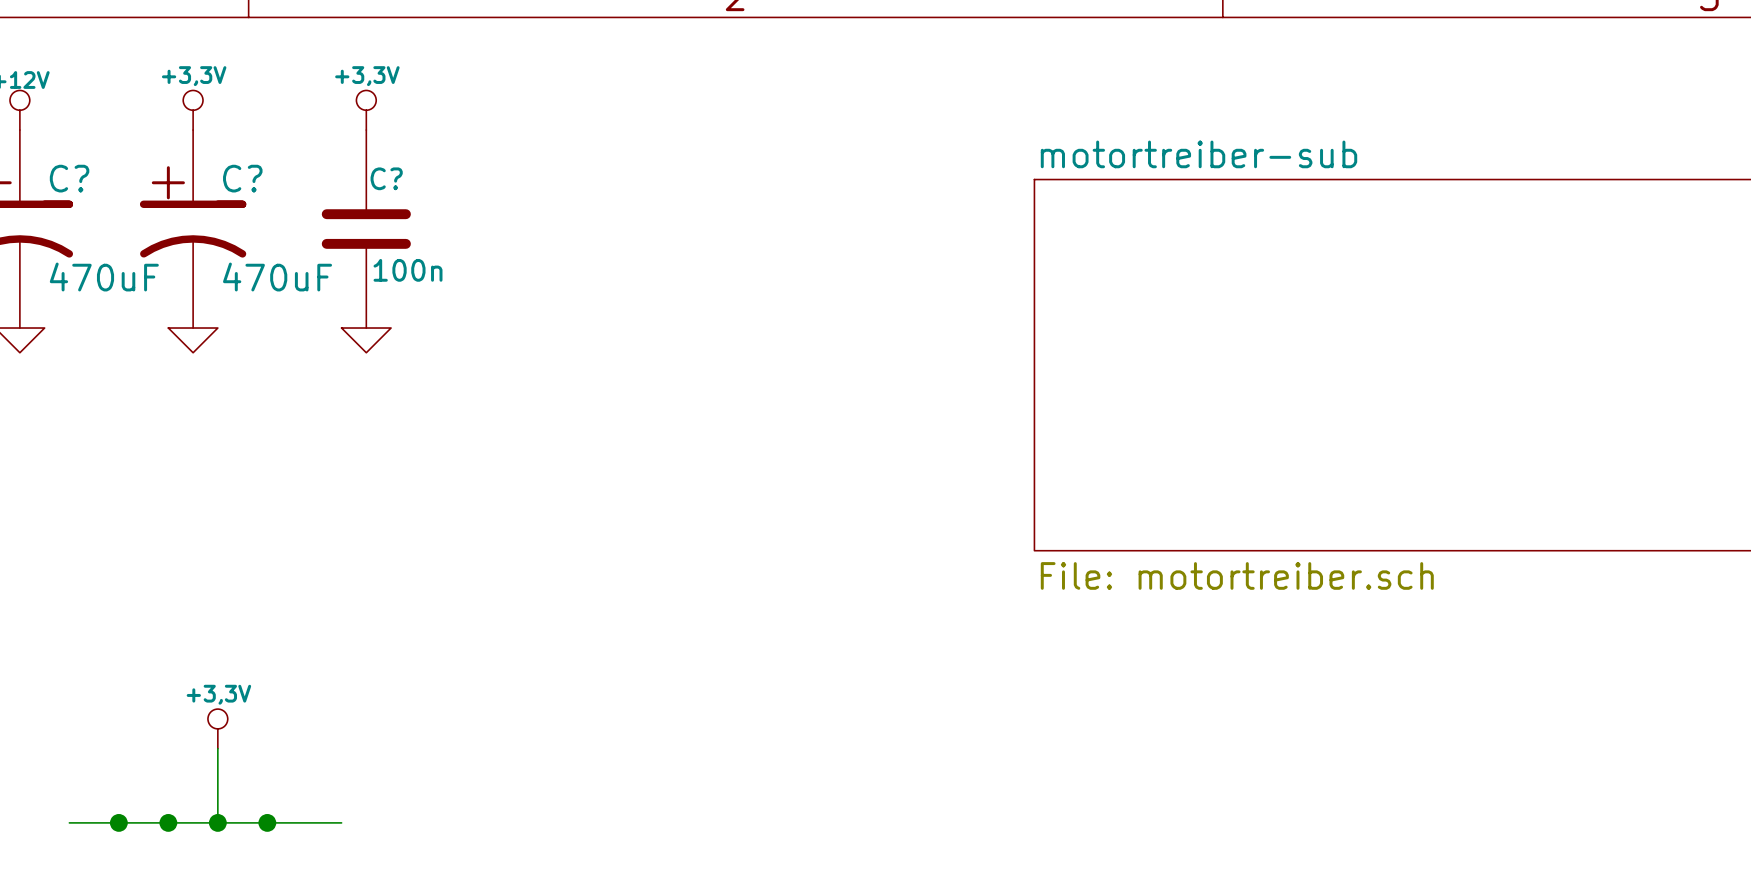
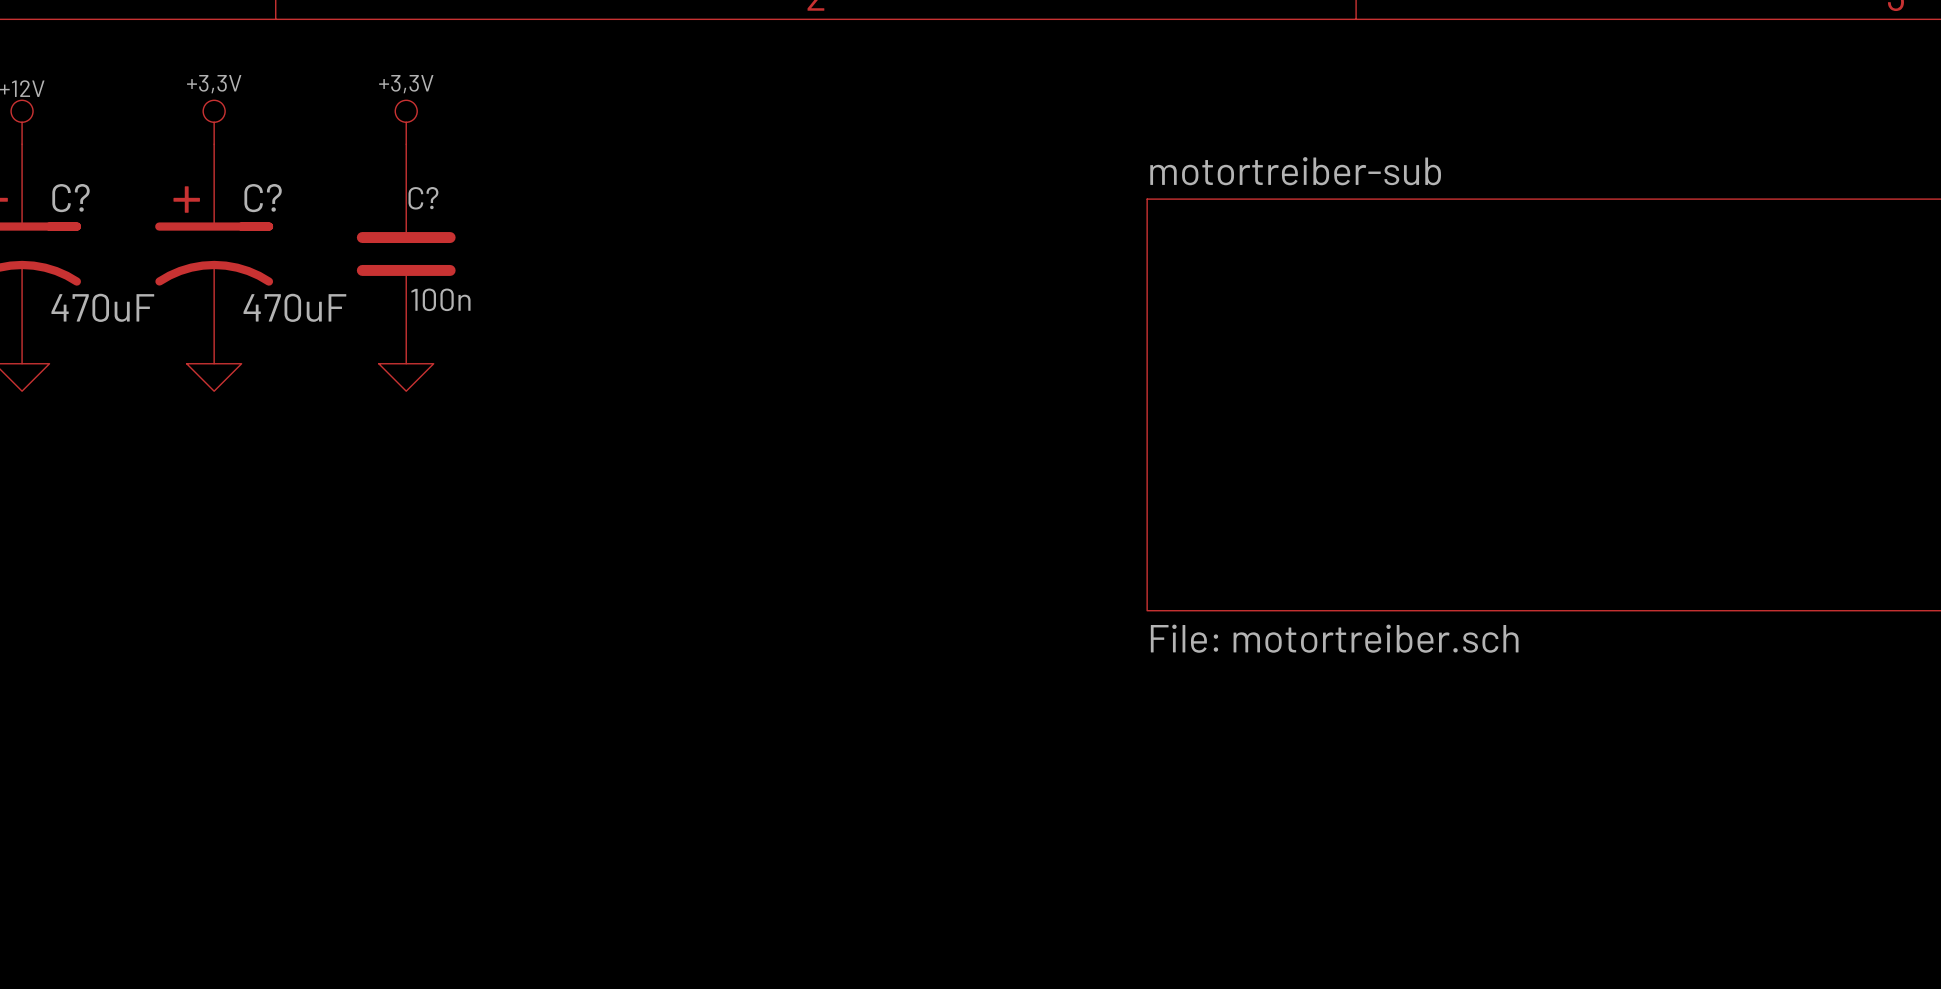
power symbol: +3,3V (217, 728) -> none
wire: (217, 748) (217, 822) -> none
wire: (69, 822) (341, 822) -> none
junction: (118, 822) -> none
junction: (168, 822) -> none
junction: (217, 822) -> none
junction: (267, 822) -> none

